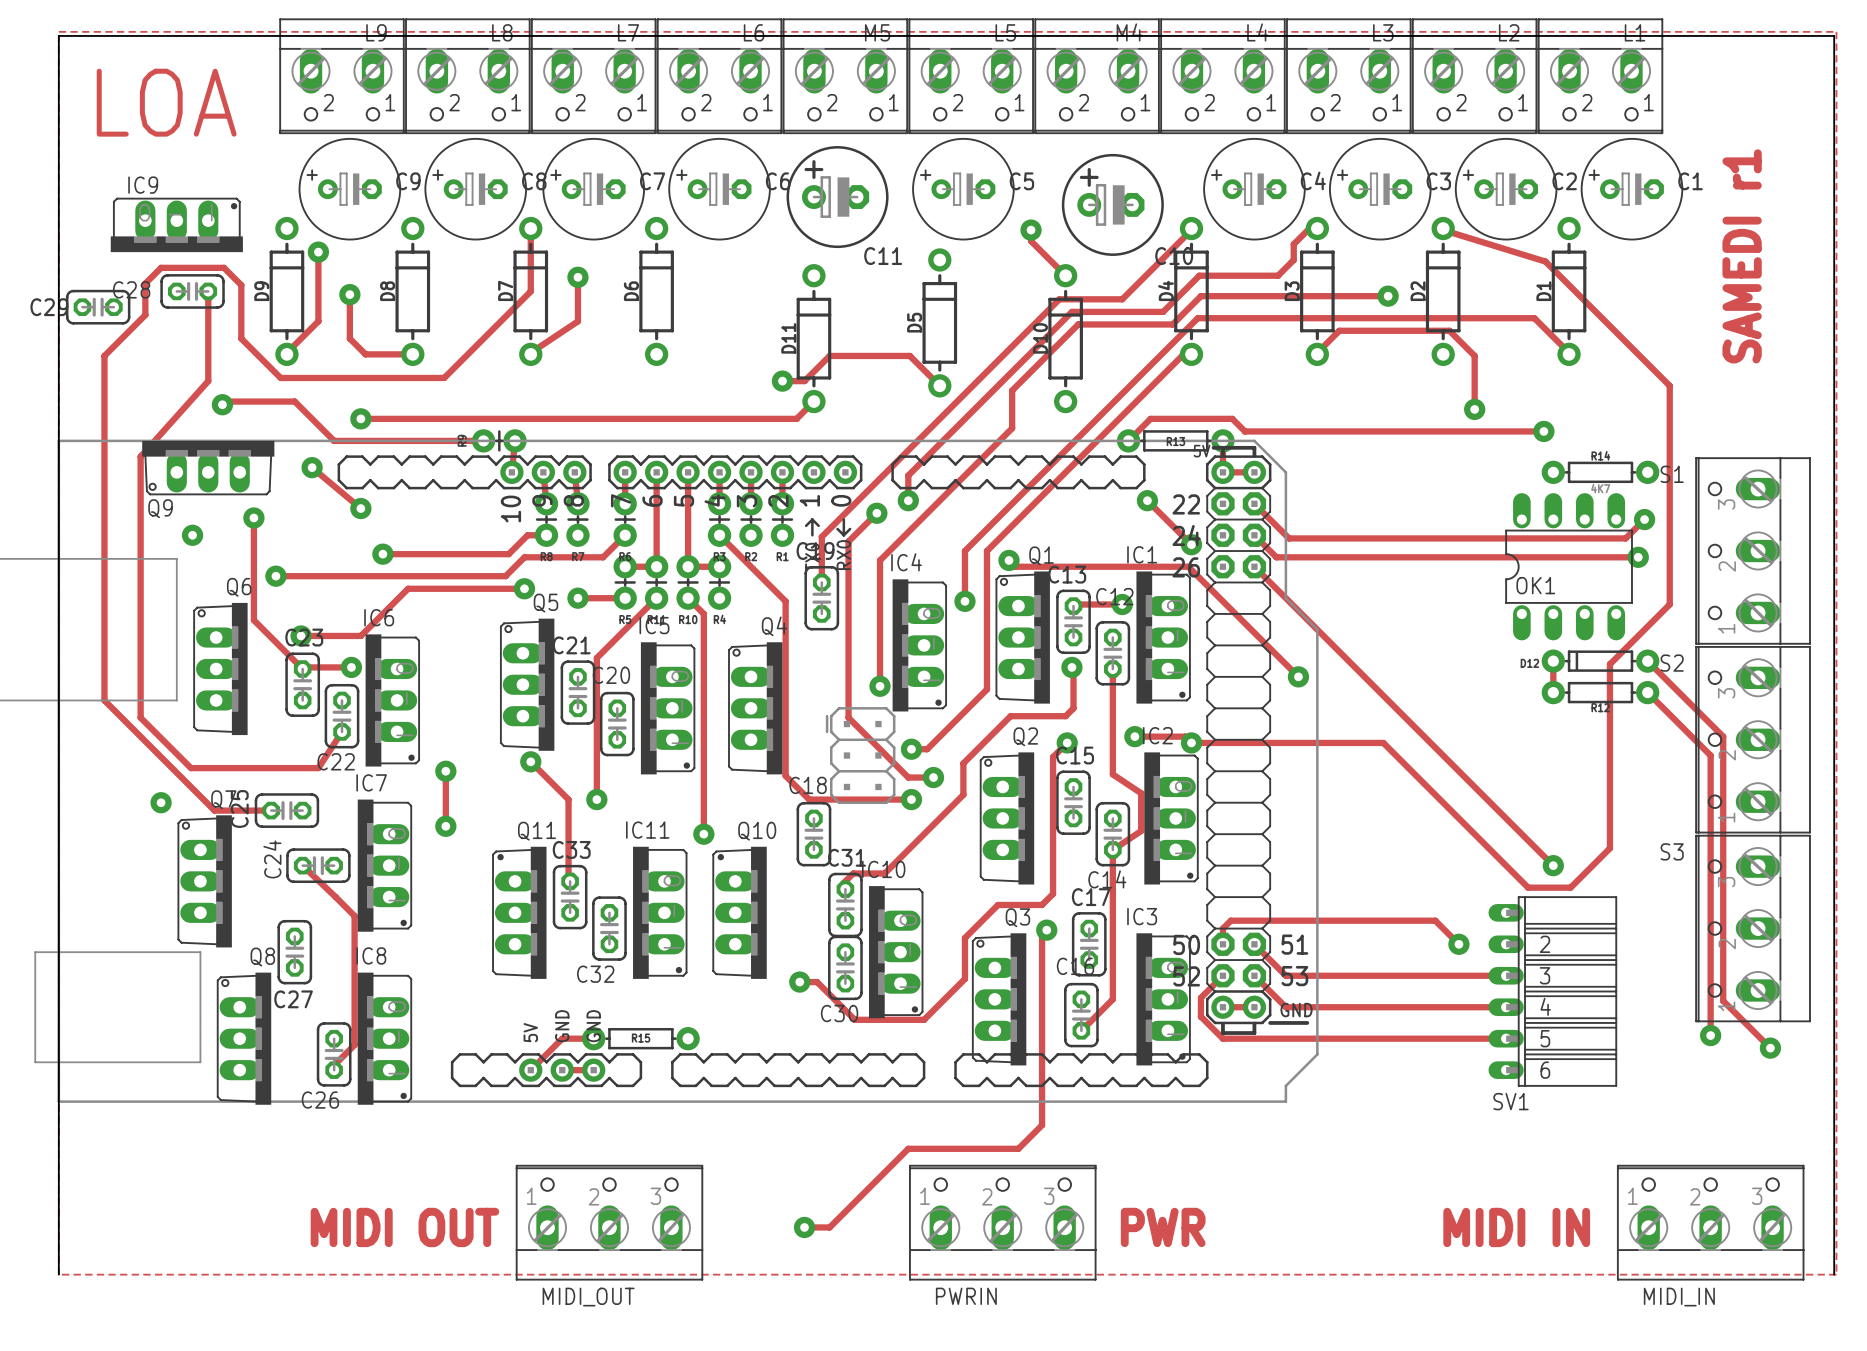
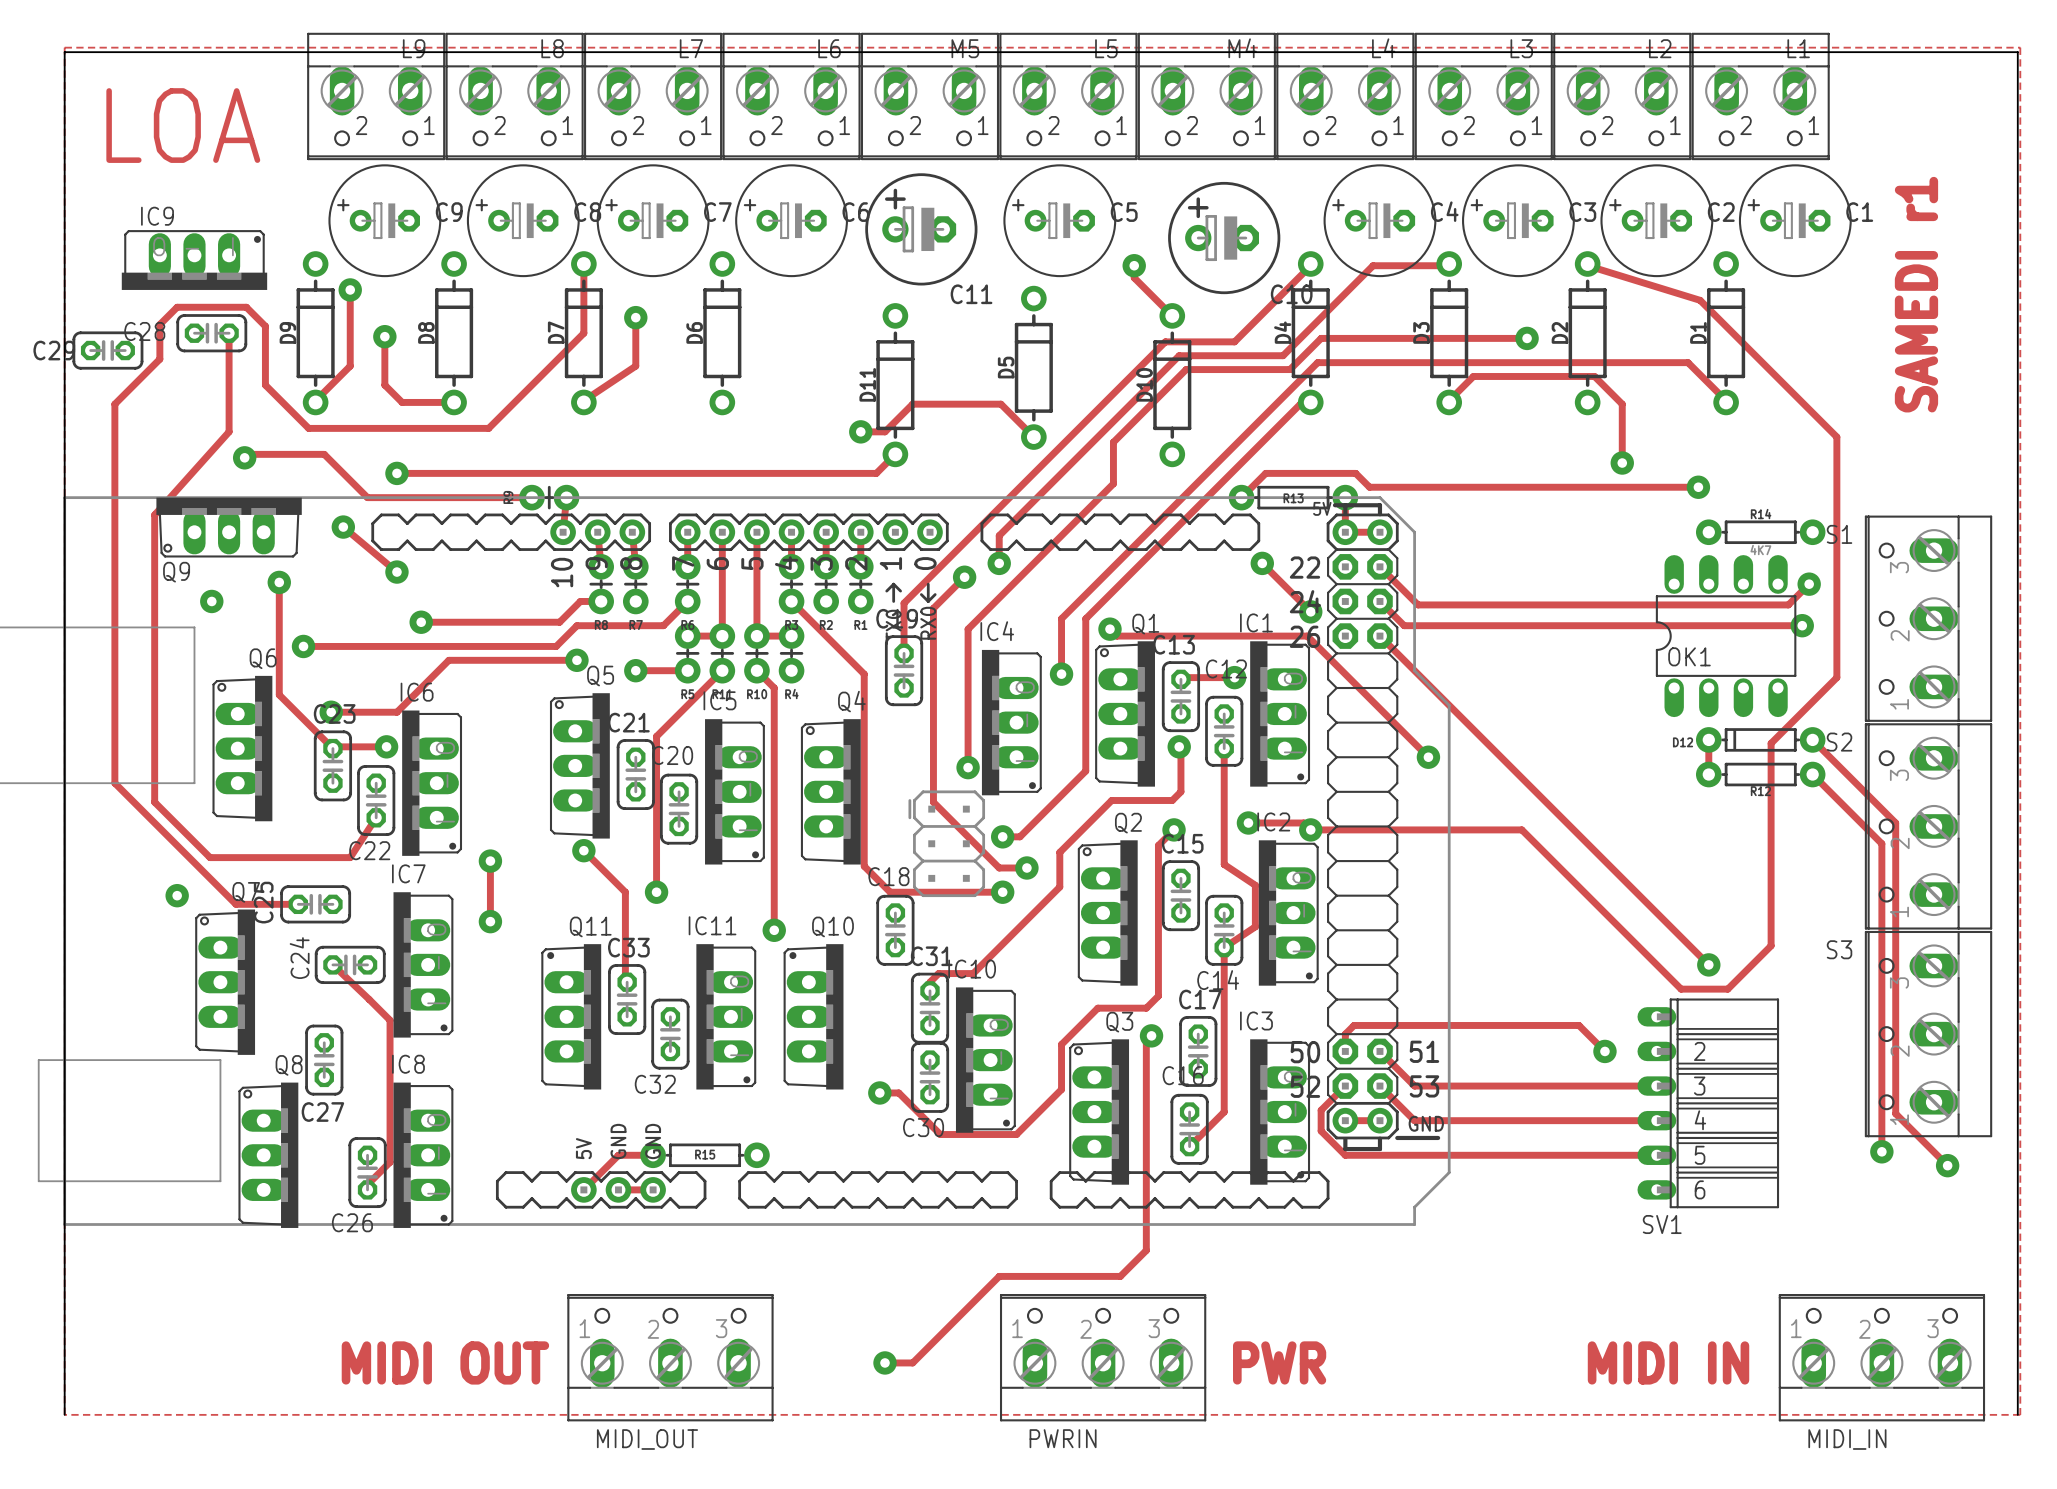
track: (1317, 228) (1309, 228) (1293, 244) (1293, 259) (1278, 275) (1199, 275) (1163, 311) -> (1449, 265) (1373, 265) (1283, 355) (1279, 355)

